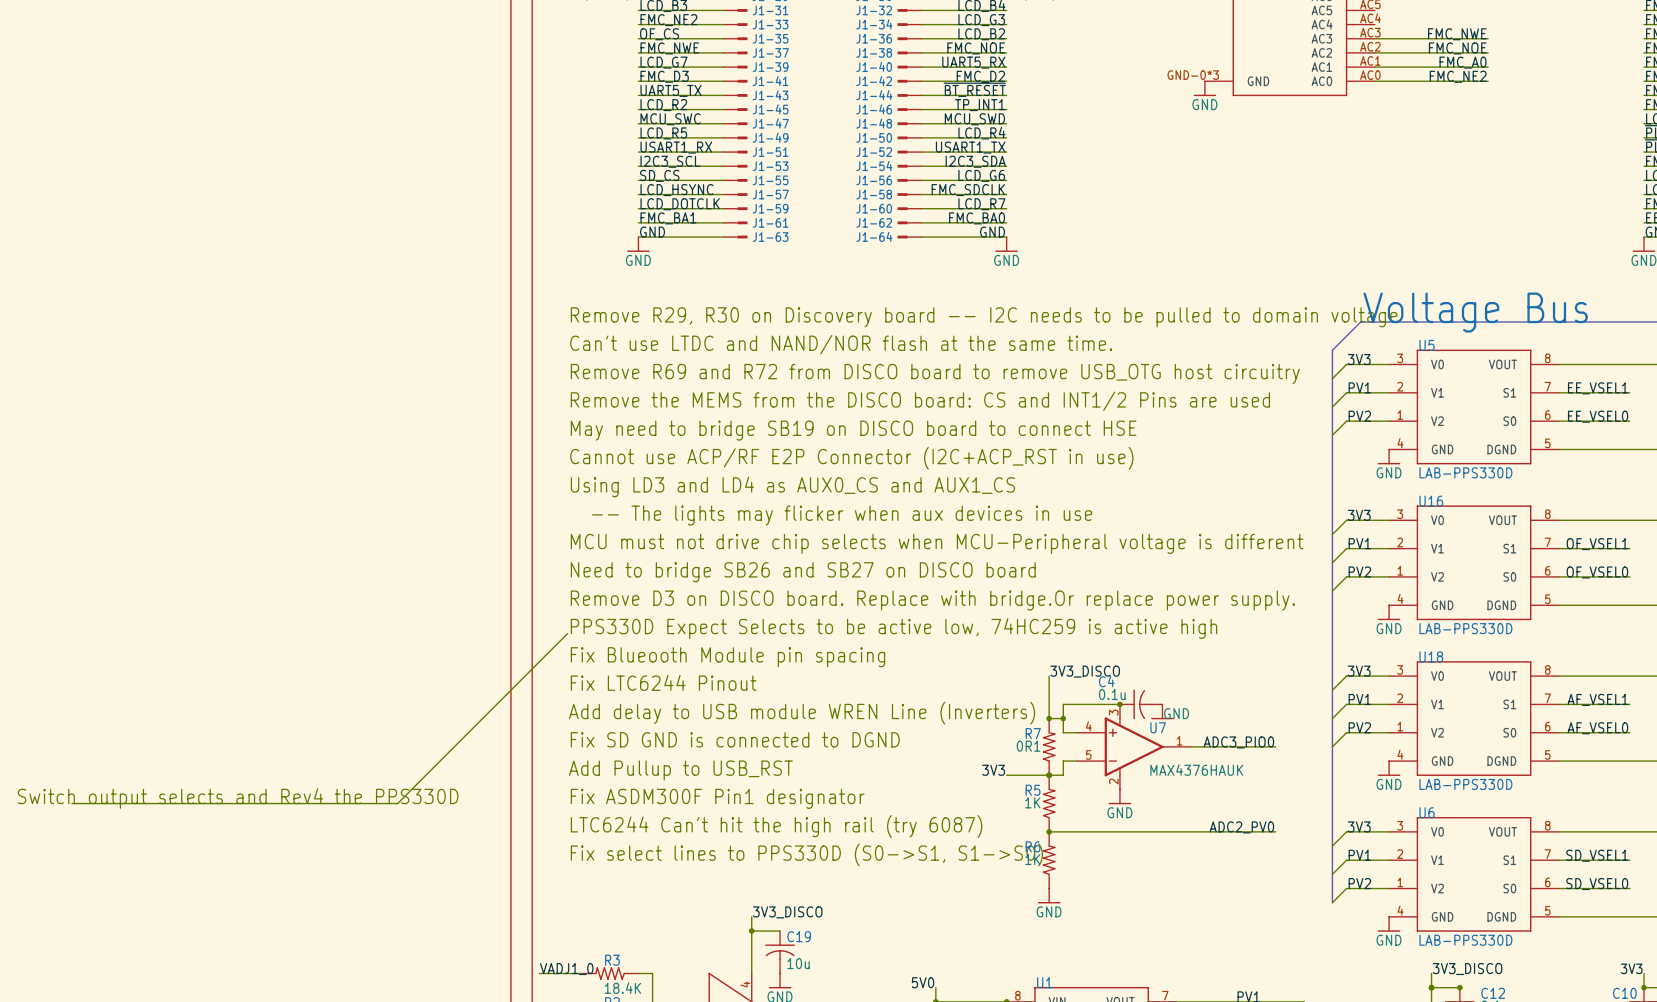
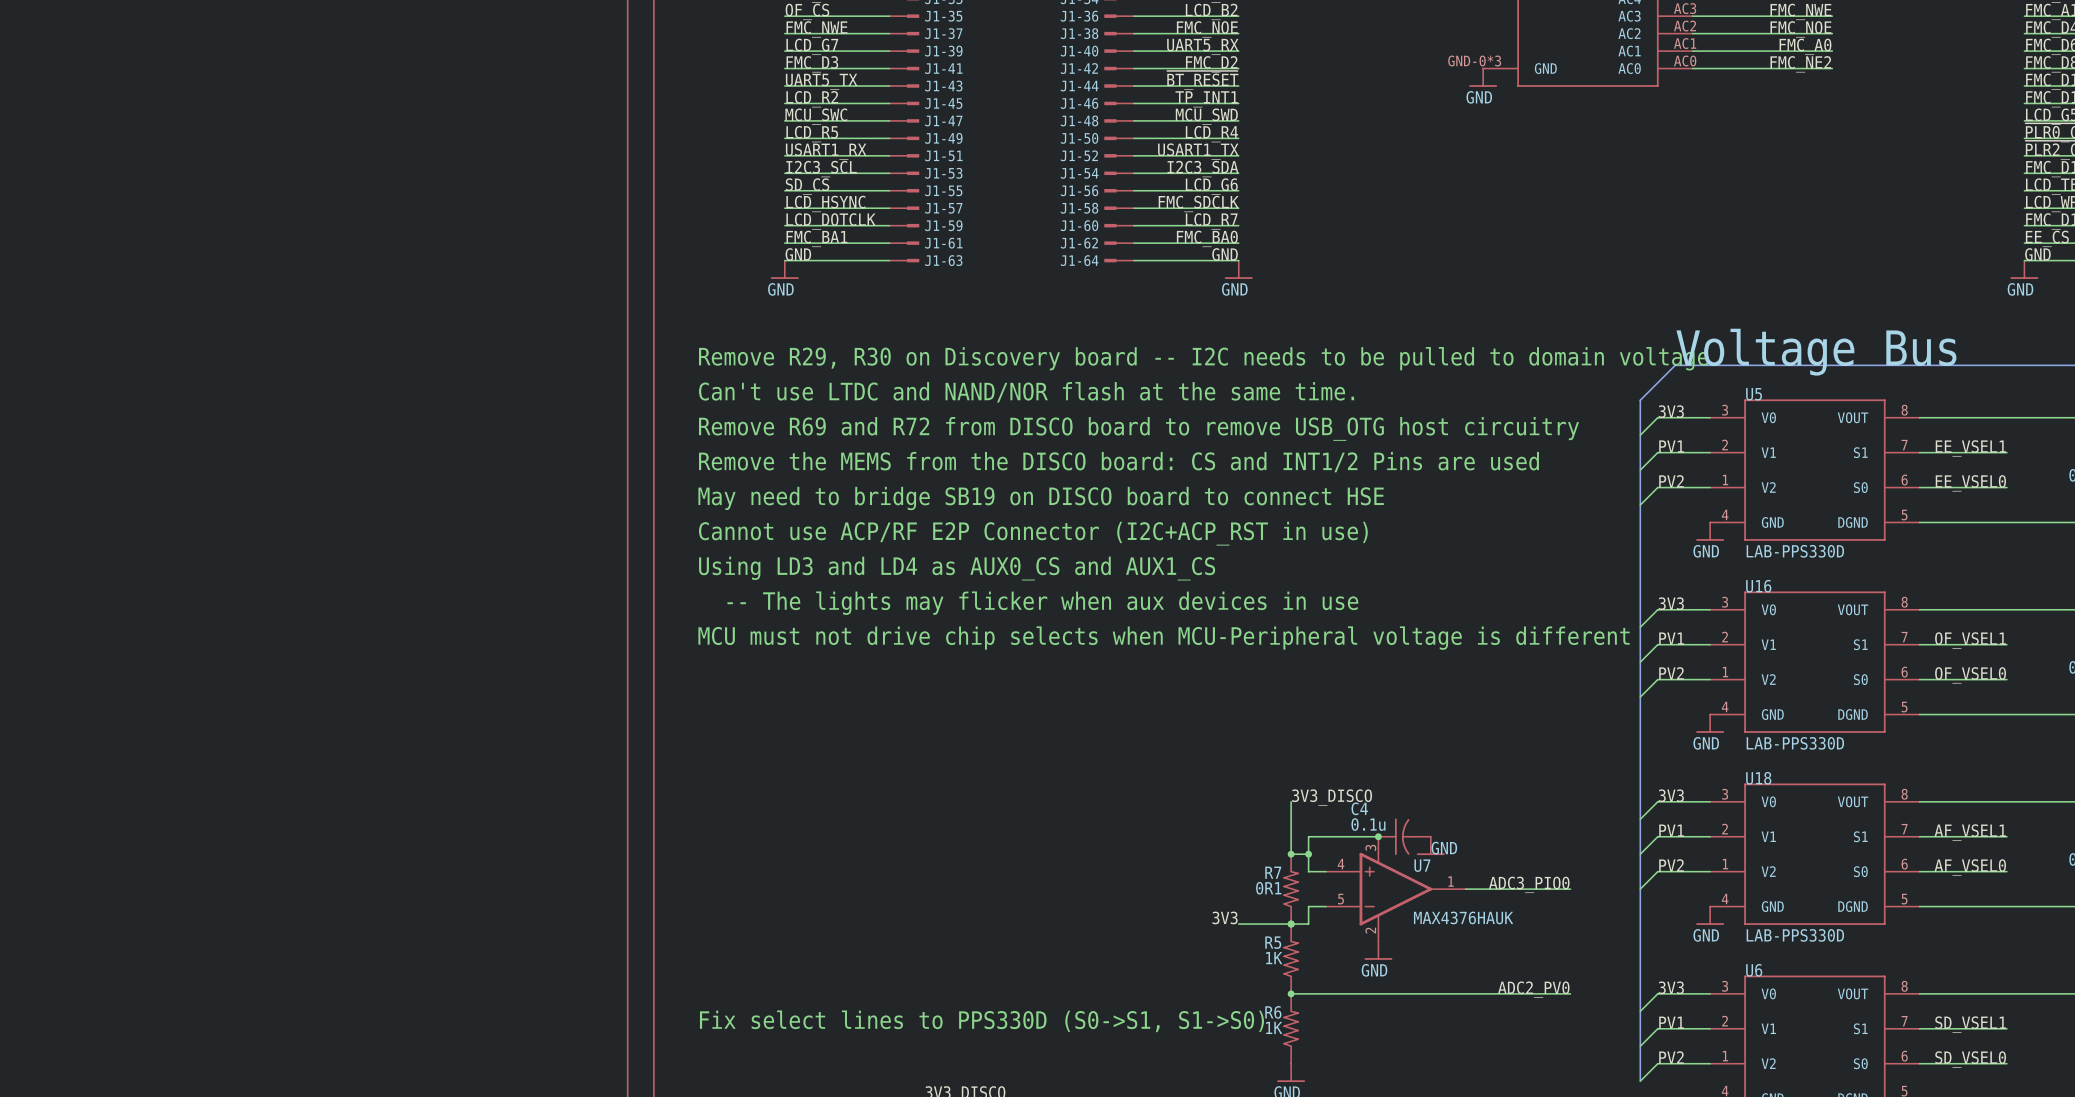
text: Need to bridge SB26 and SB27 on DISCO board (803, 572) -> none
text: Remove D3 on DISCO board. Replace with bridge.Or replace power supply. (932, 600) -> none
text: PPS330D Expect Selects to be active low, 74HC259 is active high (894, 628) -> none
wire: (567, 633) (397, 803) (71, 803) -> none
text: Fix Blueooth Module pin spacing (727, 657) -> none
text: Fix LTC6244 Pinout (663, 682) -> none
text: Add delay to USB module WREN Line (Inverters) (802, 713) -> none
text: Fix SD GND is connected to DGND (735, 739) -> none
text: Add Pullup to USB_RST (680, 770) -> none
text: Switch output selects and Rev4 the PPS330D (238, 798) -> none
text: Fix ASDM300F Pin1 designator (717, 798) -> none
text: LTC6244 Can't hit the high rail (try 6087) (776, 826) -> none

